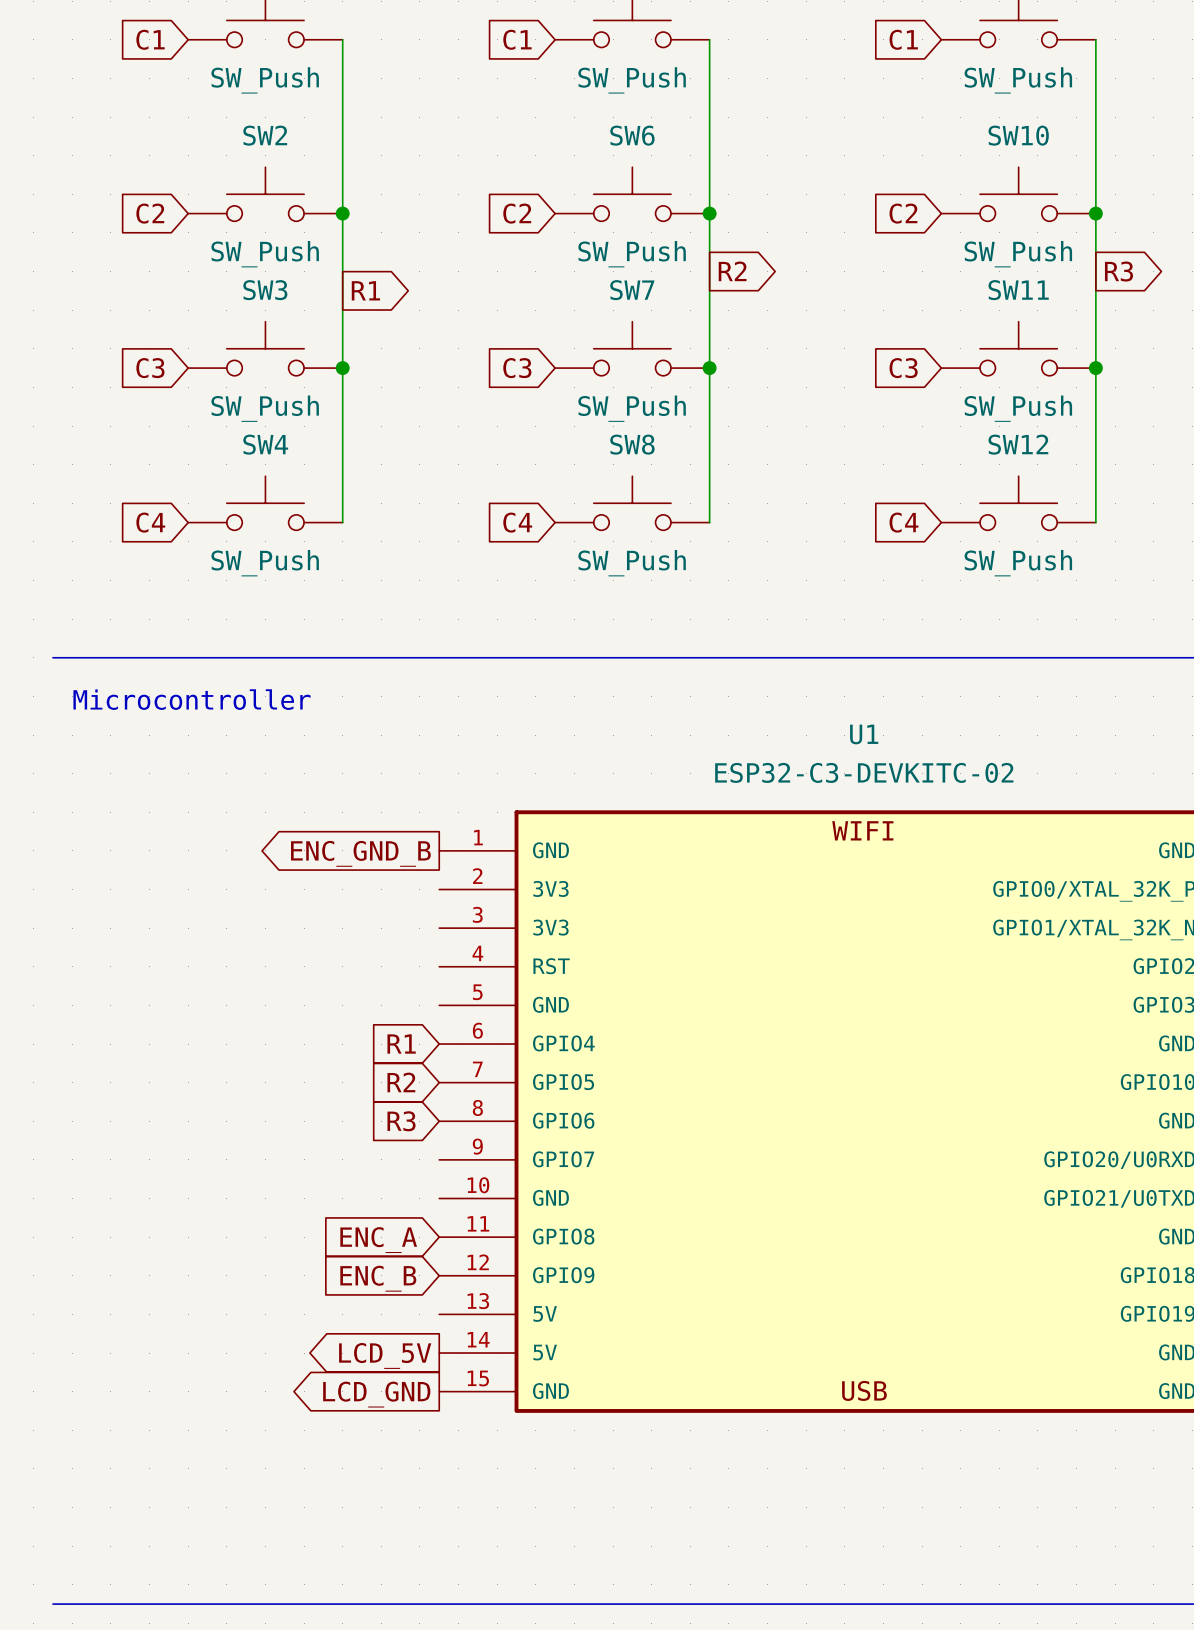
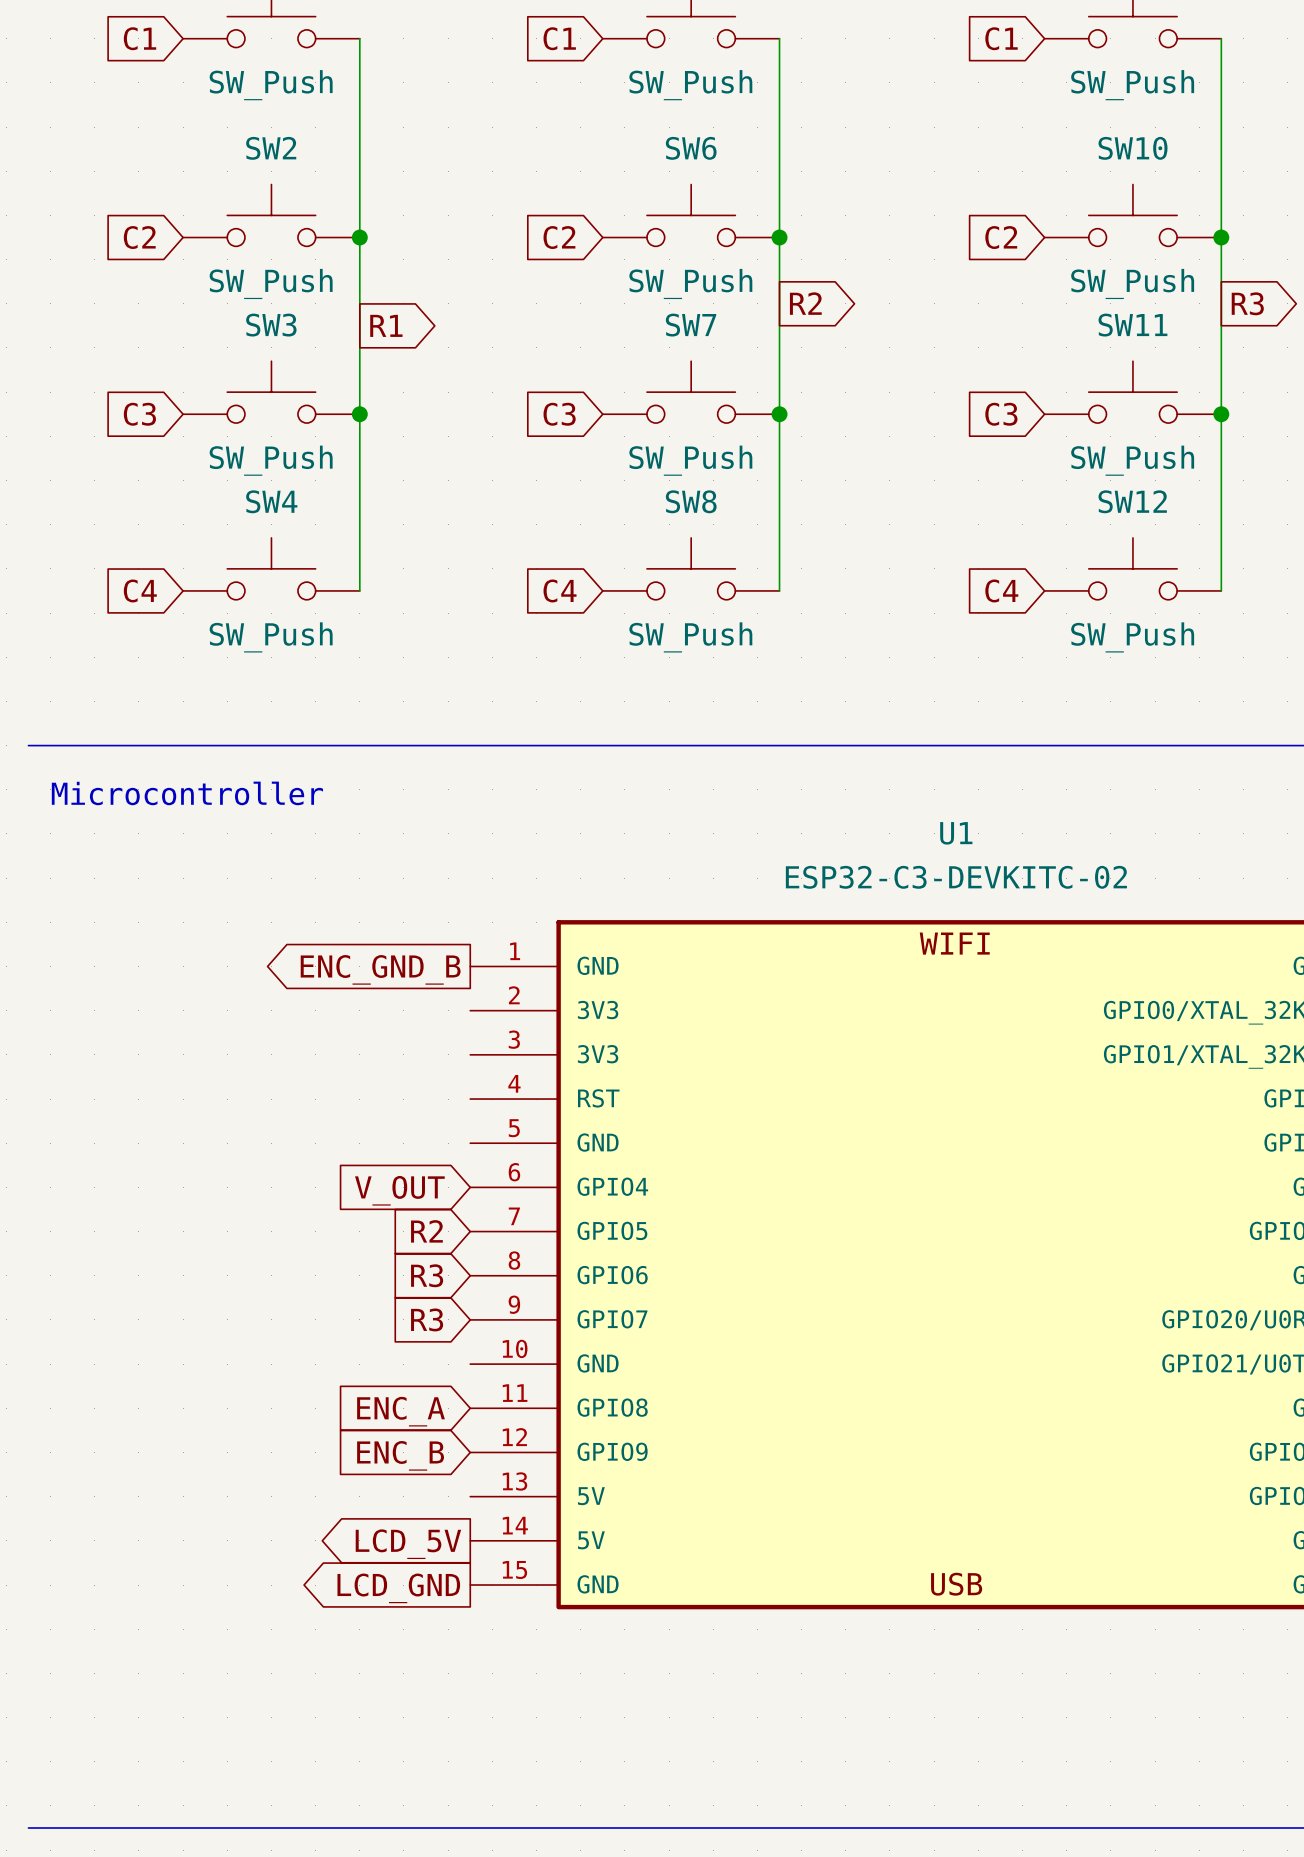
global label: R1 (401, 1044) -> V_OUT (399, 1190)
global label: none -> R3 (427, 1319)

